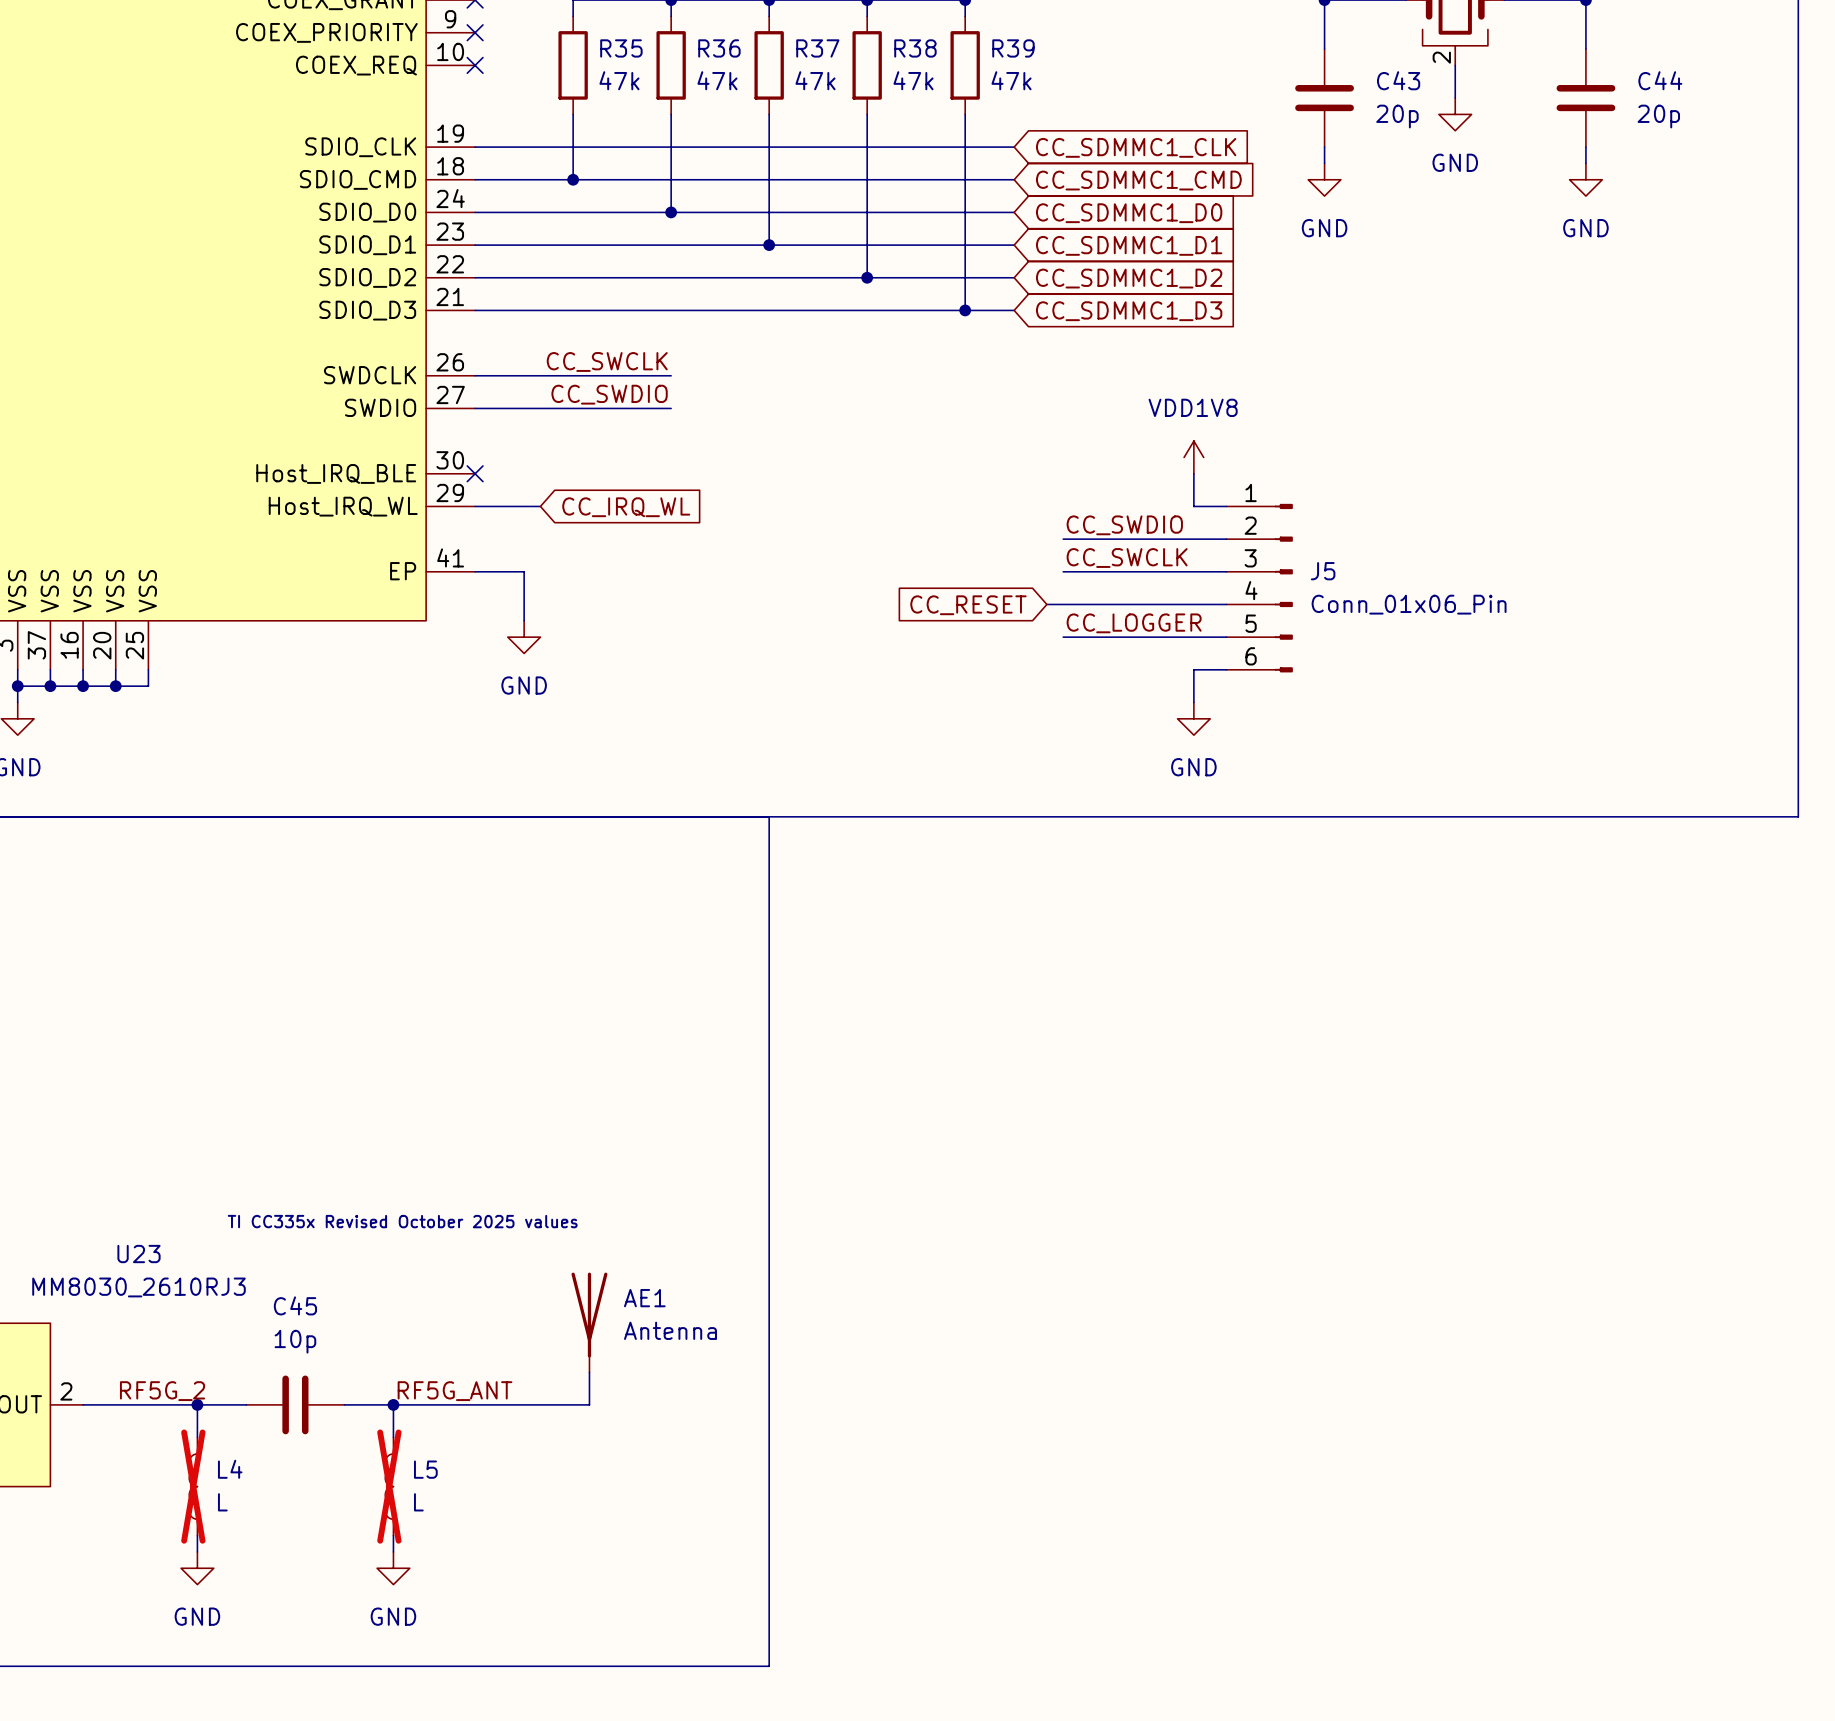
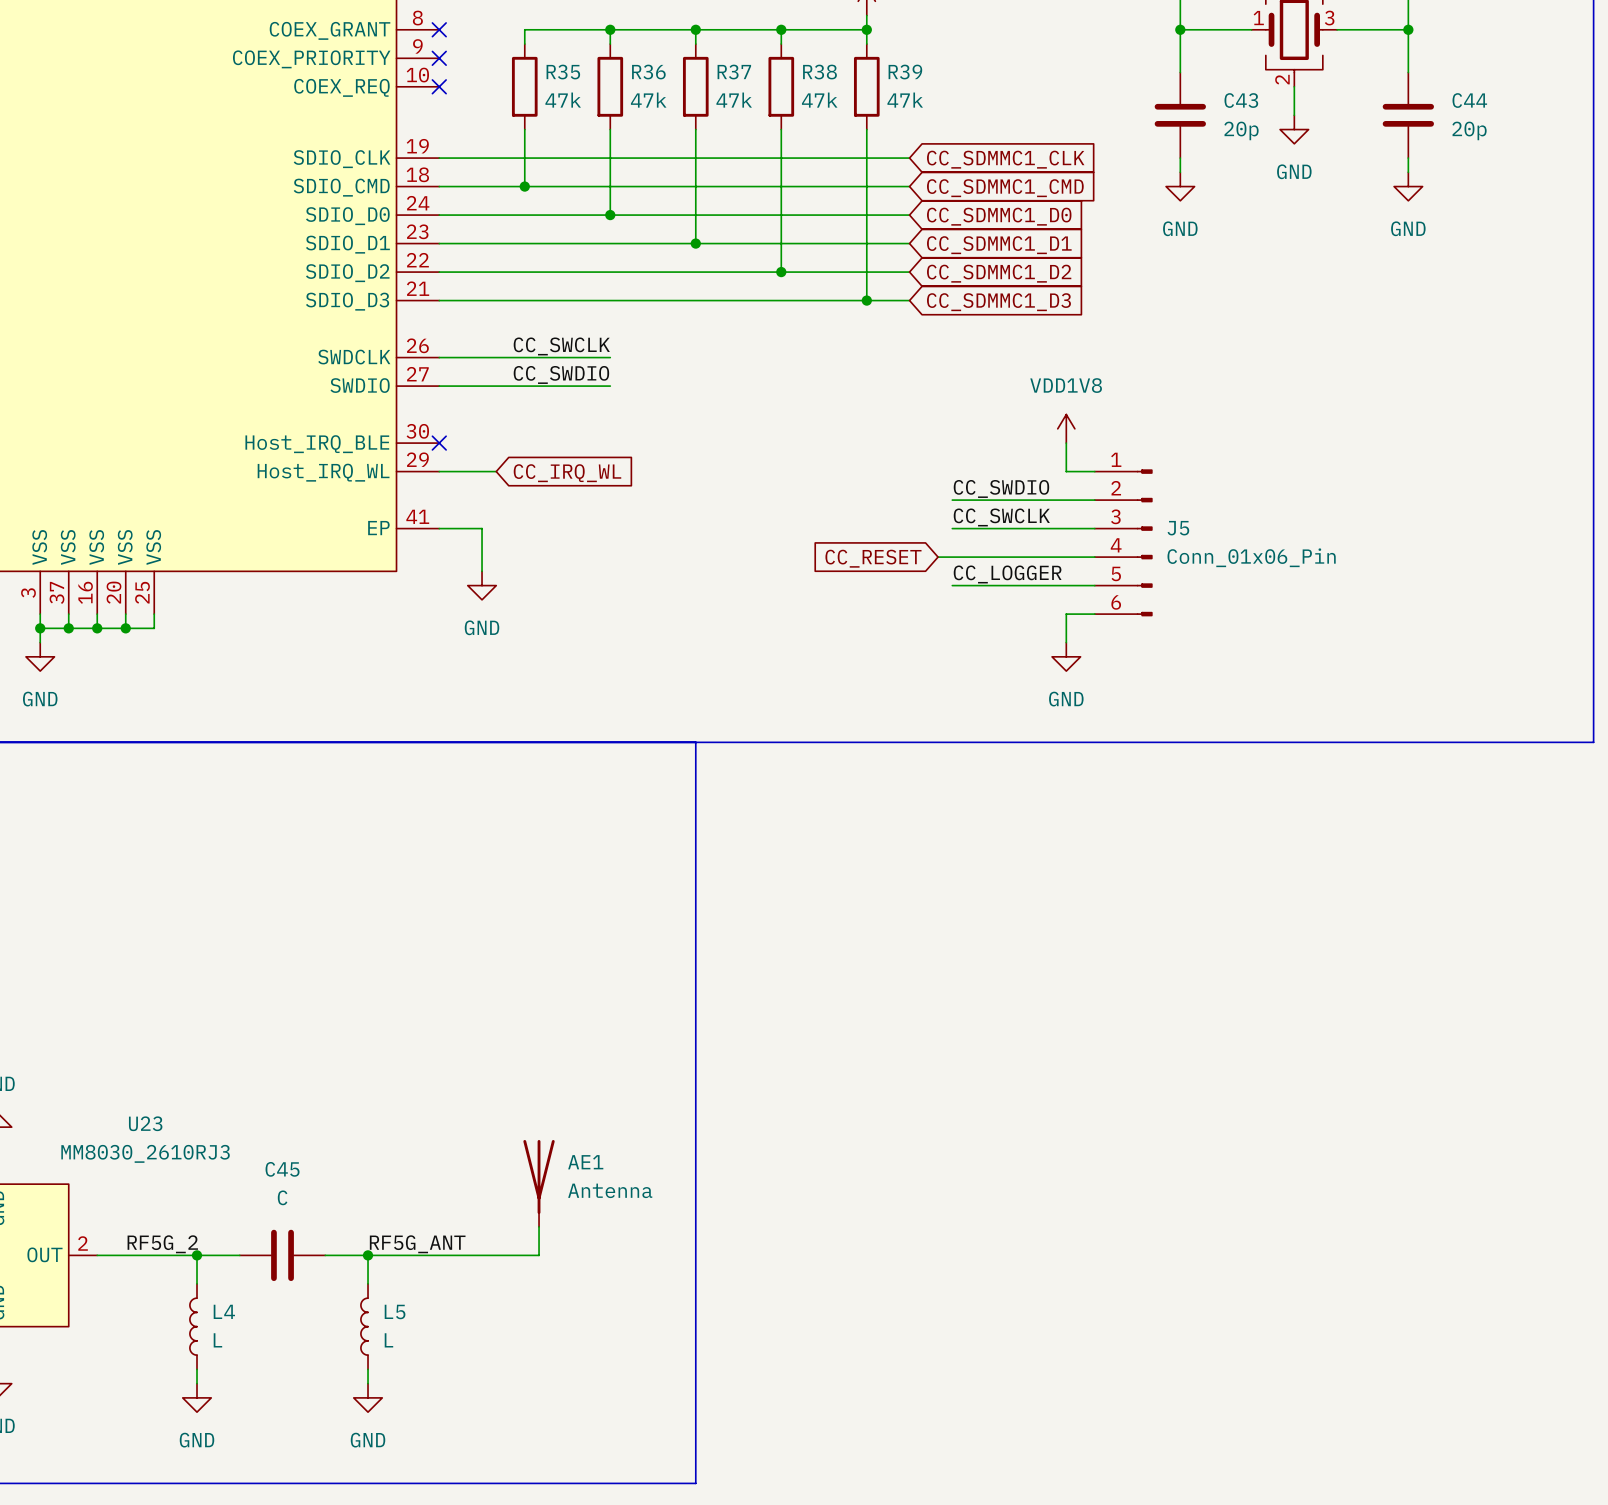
text: TI CC335x Revised October 2025 values (402, 1221) -> none
C45 value: 10p (295, 1341) -> C (282, 1197)
L4 do-not-place cross: (193, 1486) -> none
L5 do-not-place cross: (389, 1486) -> none

